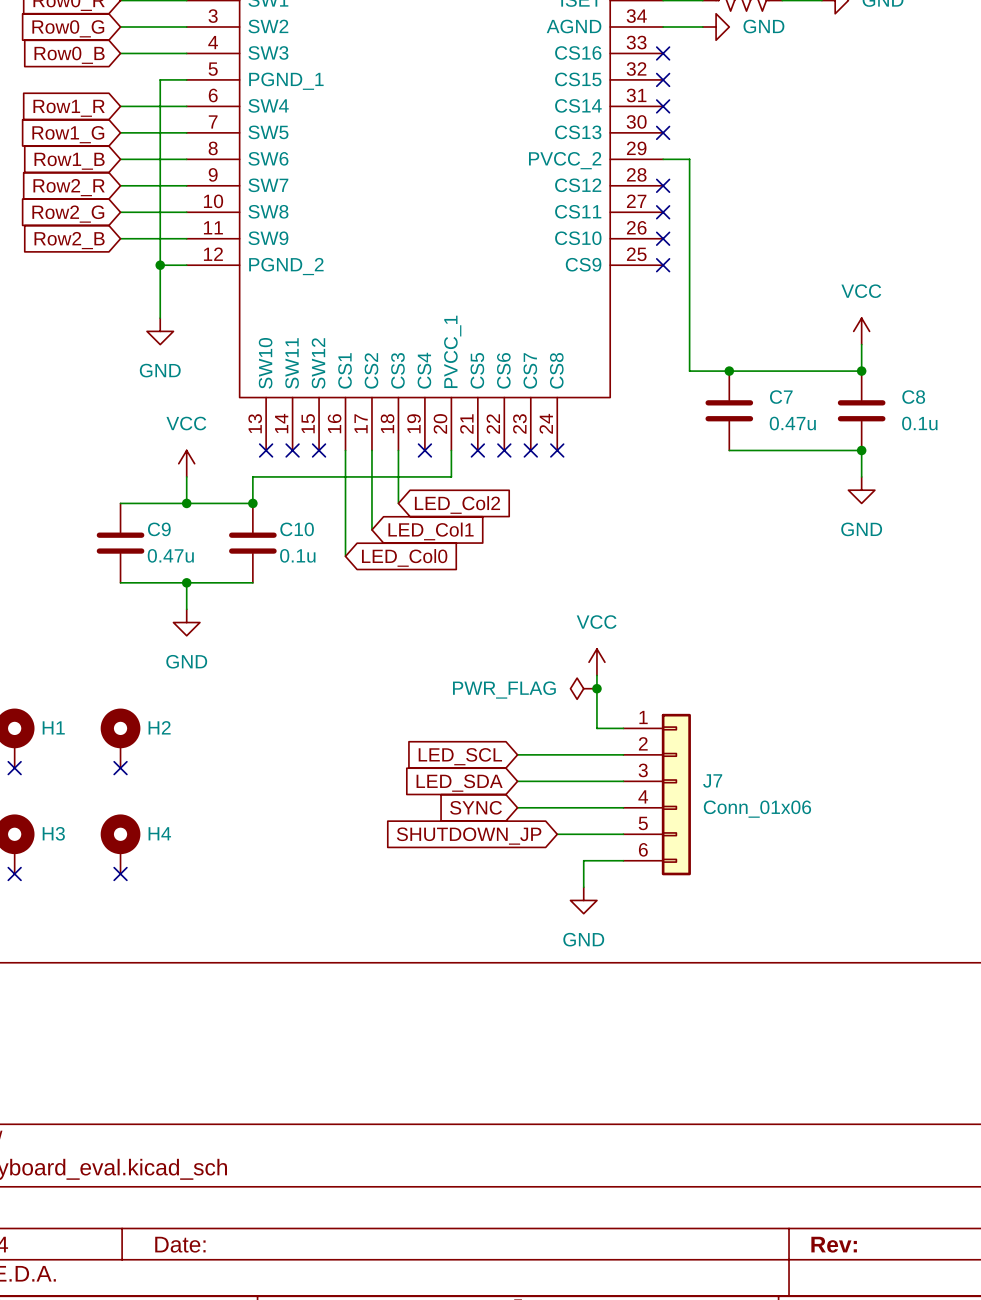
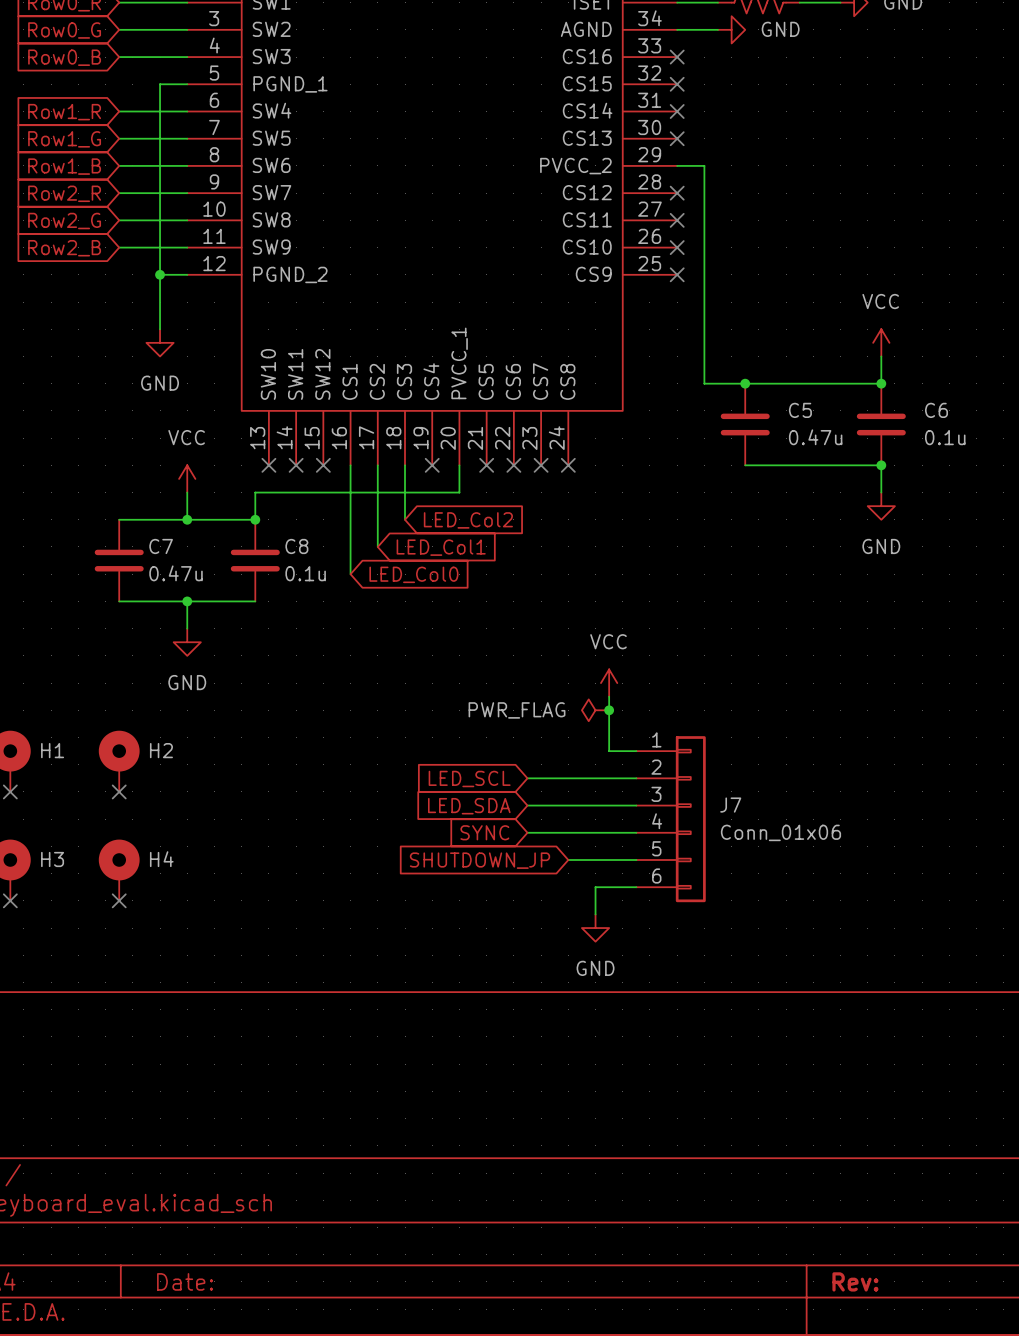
C7 name: C7 (781, 397) -> C5 (800, 410)
C8 name: C8 (913, 397) -> C6 (936, 410)
C9 name: C9 (159, 529) -> C7 (161, 546)
C10 name: C10 (297, 529) -> C8 (296, 546)

